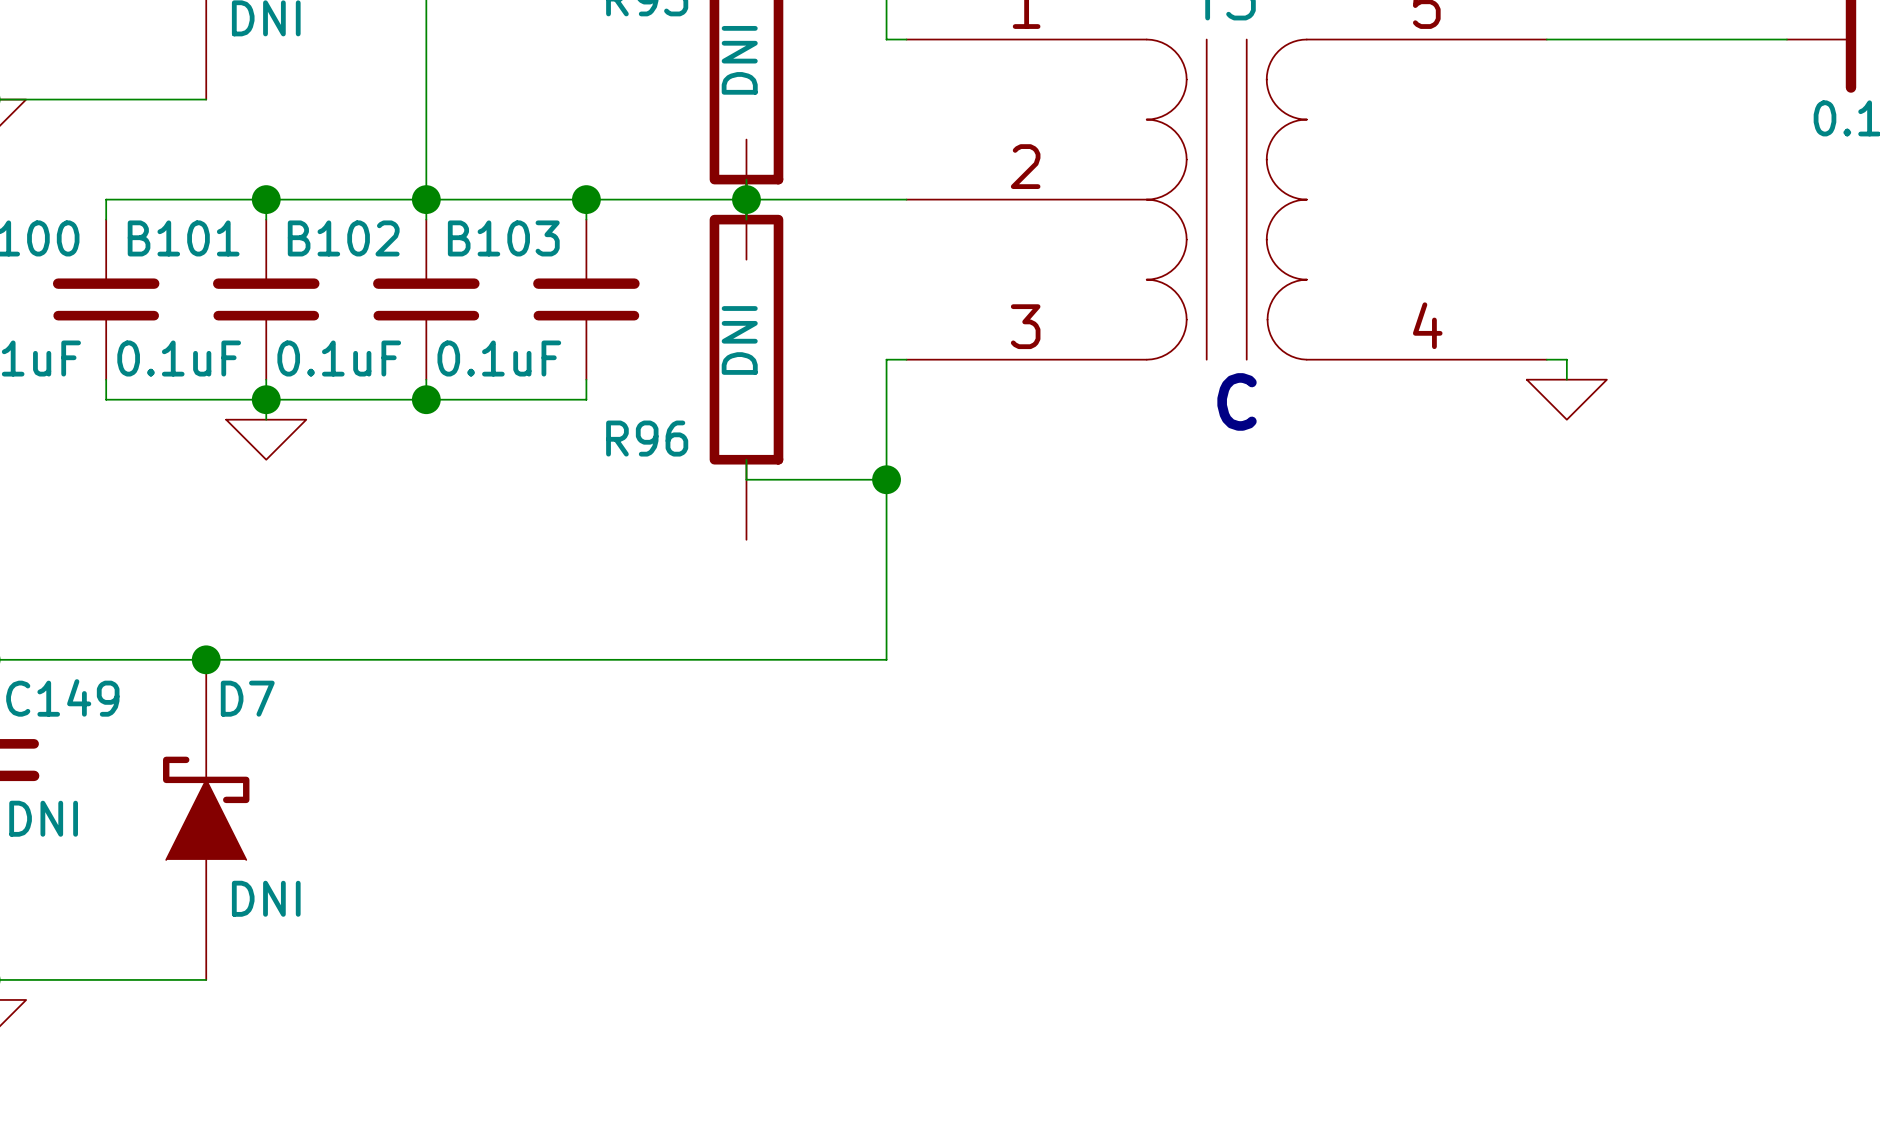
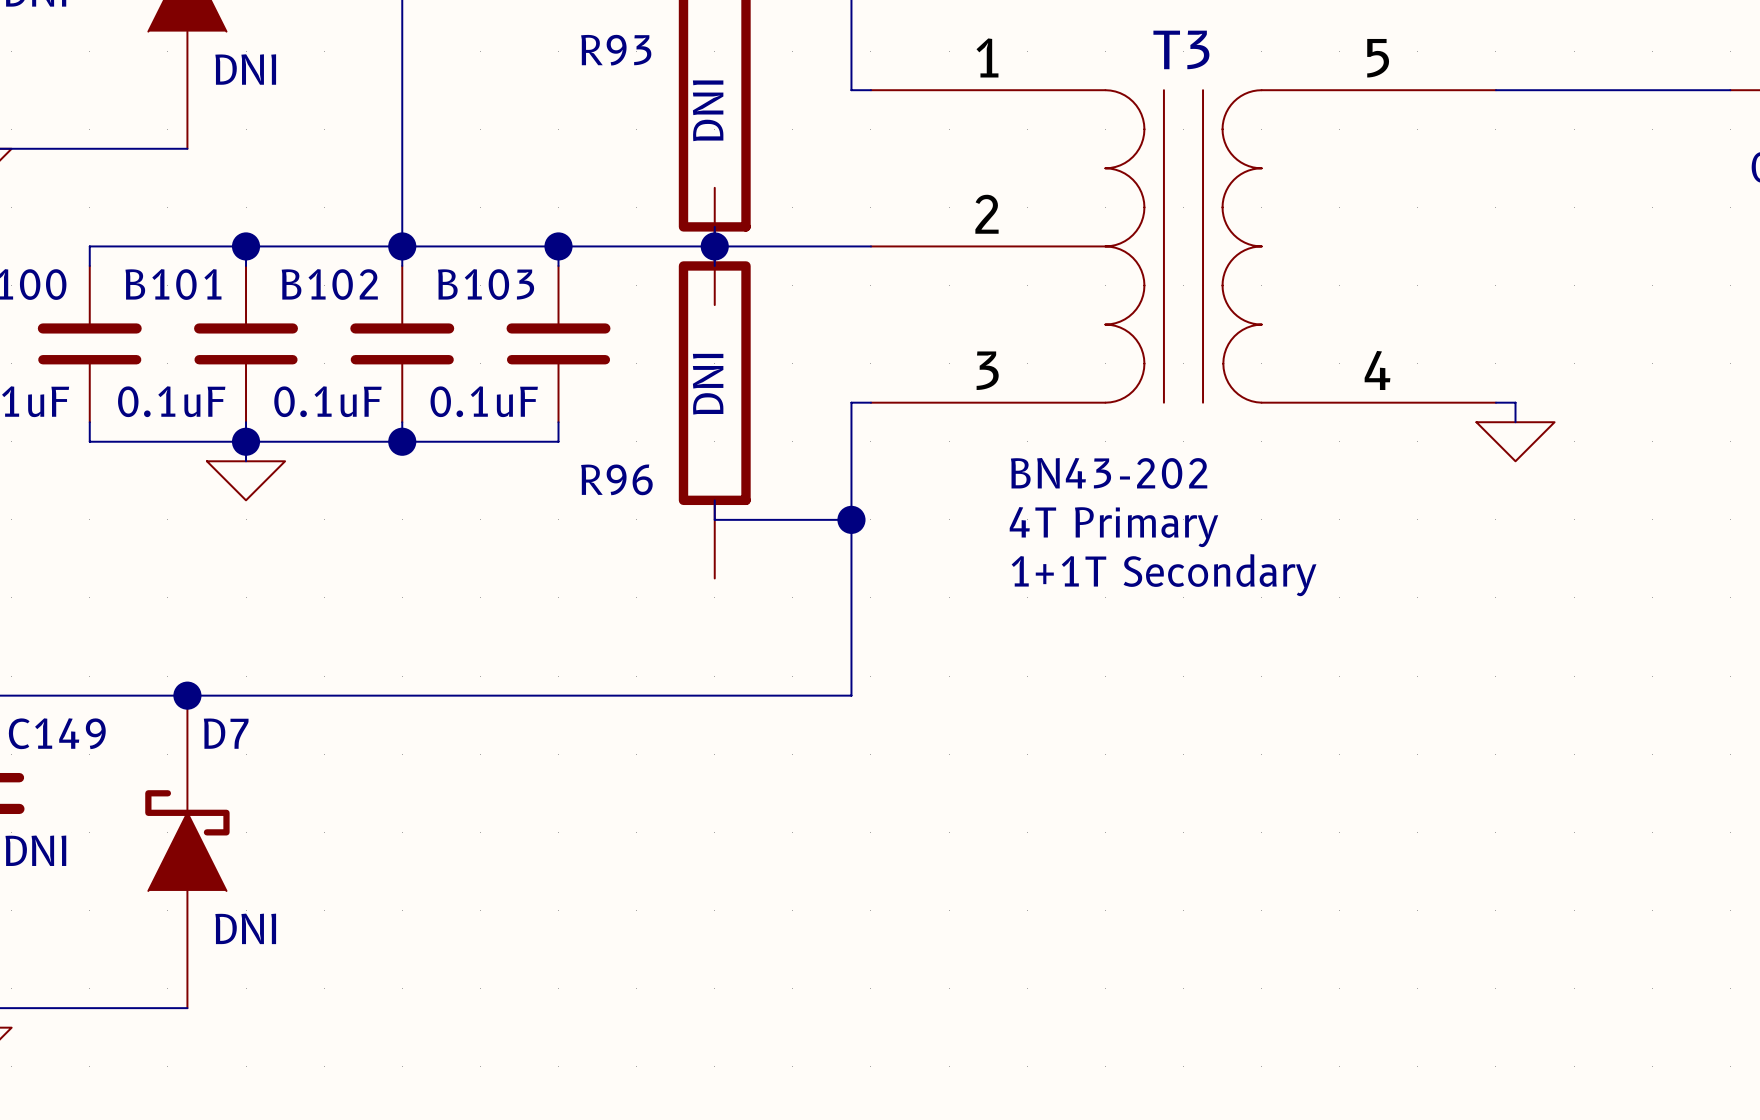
text: C (1237, 401) -> none
text: none -> BN43-202 (1109, 473)
text: none -> 4T Primary (1113, 527)
text: none -> 1+1T Secondary (1164, 575)

